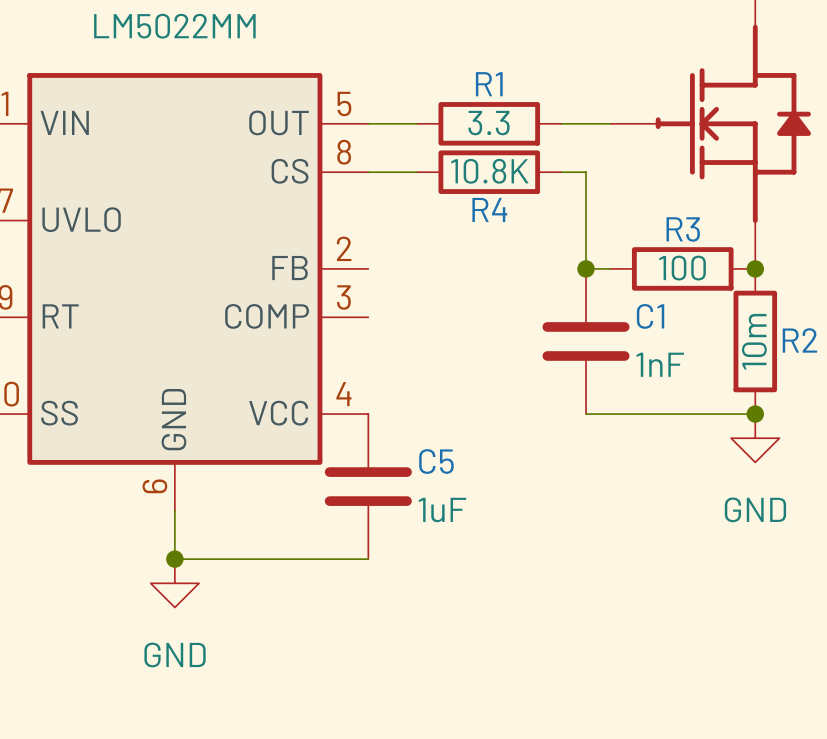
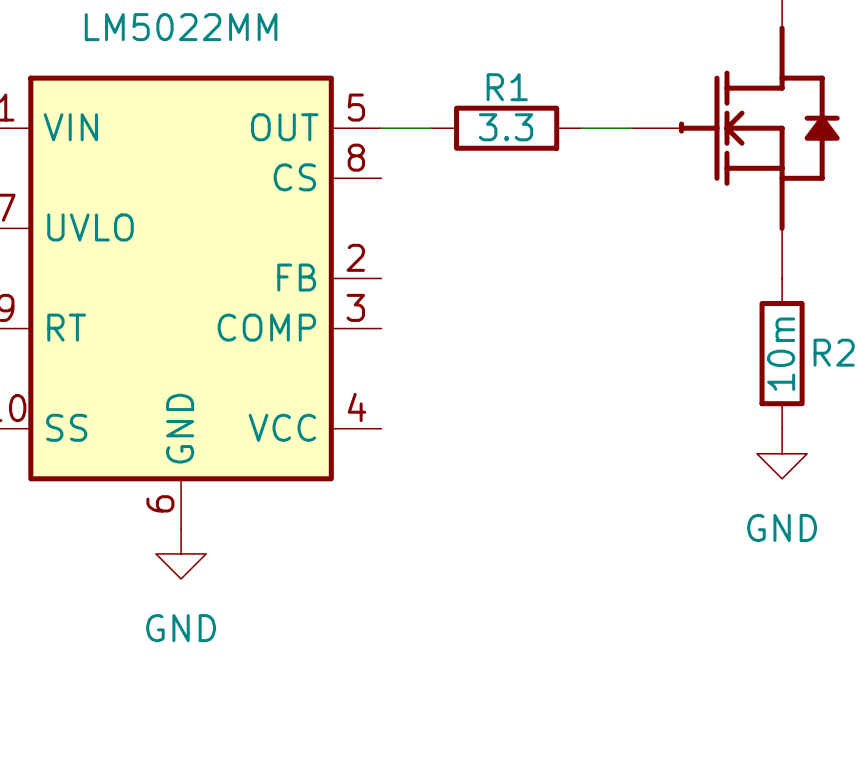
wire: (368, 172) (416, 172) -> none
R4: 10.8K (489, 172) -> none
wire: (561, 172) (586, 172) (586, 268) (610, 268) -> none
junction: (586, 268) -> none
R3: 100 (682, 268) -> none
junction: (755, 268) -> none
C1: 1nF (586, 341) -> none
wire: (586, 414) (755, 414) -> none
junction: (755, 414) -> none
C5: 1uF (368, 486) -> none
wire: (174, 510) (174, 559) (368, 559) -> none
junction: (174, 559) -> none
power symbol position: GND (174, 583) -> GND (181, 553)

